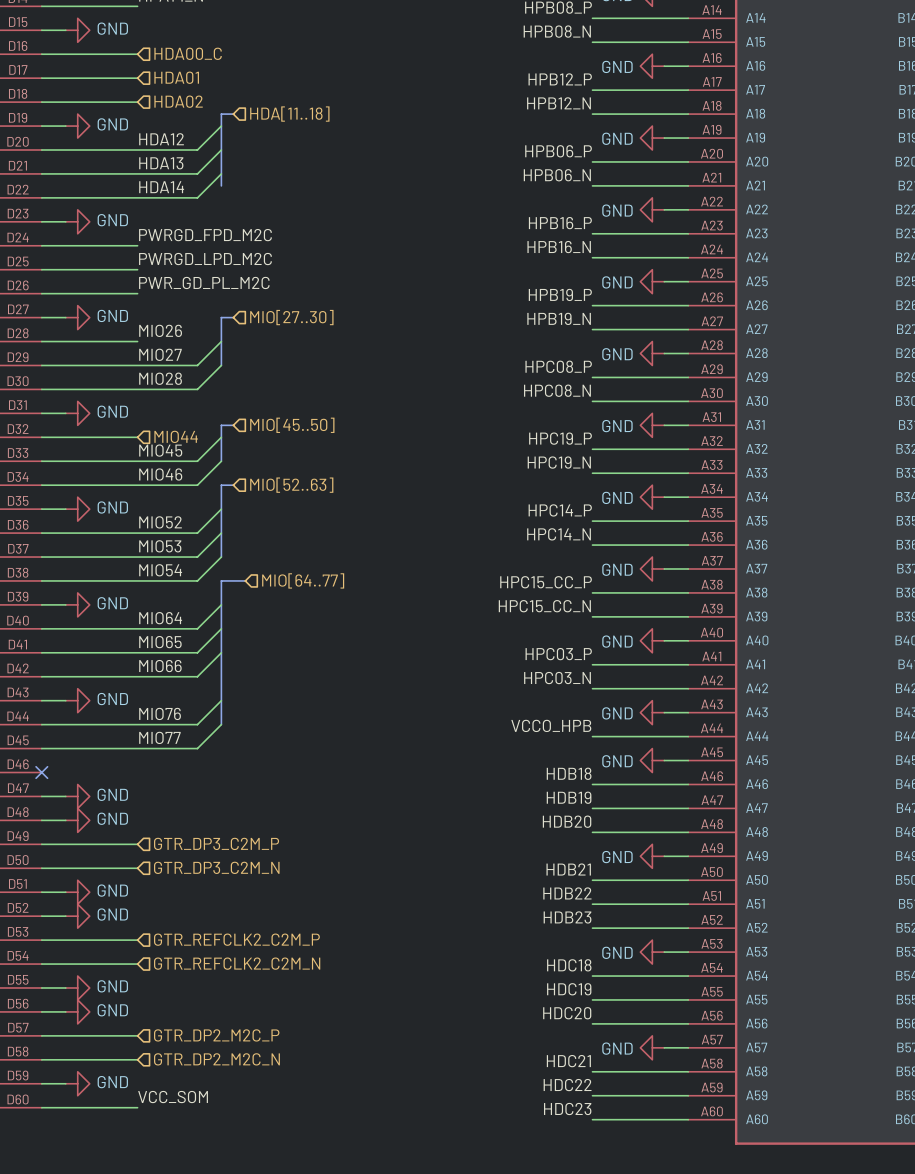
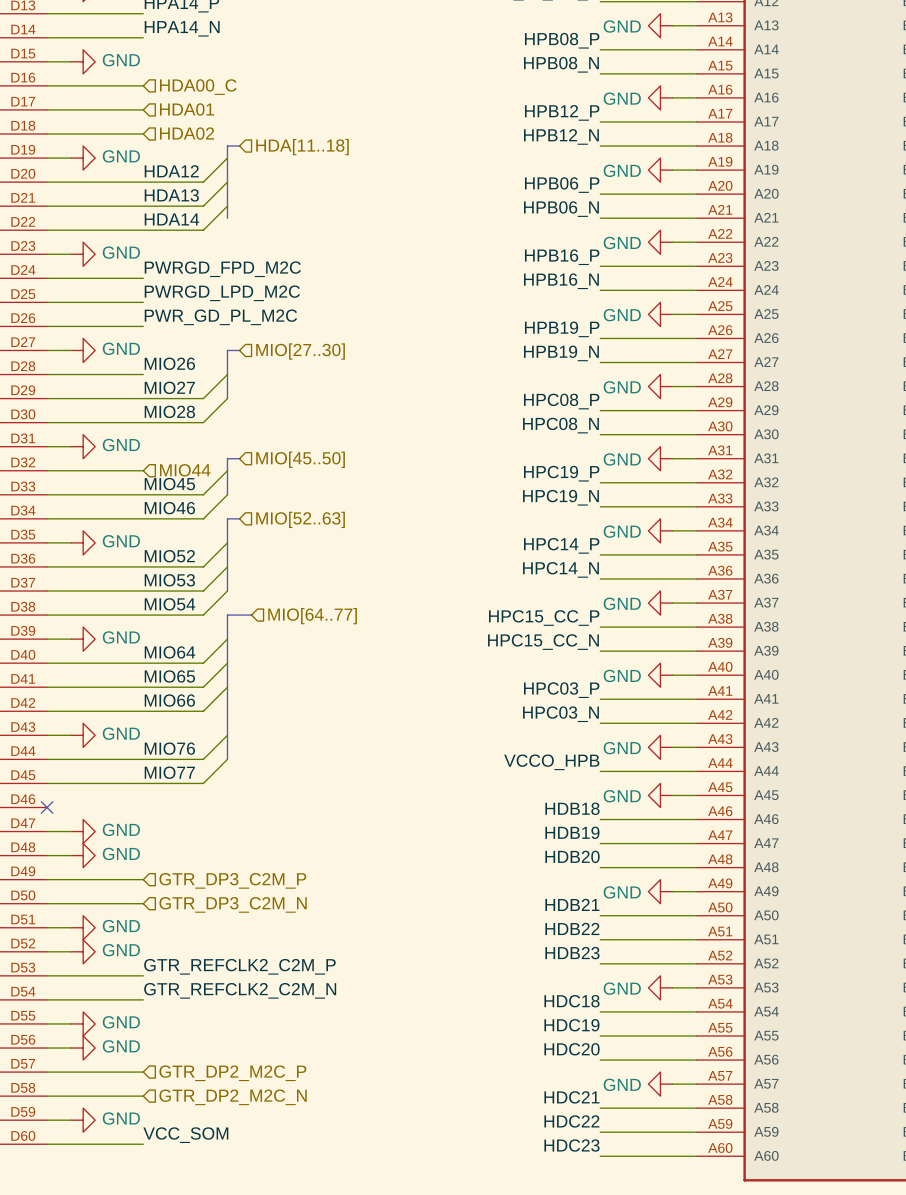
label: none -> GTR_REFCLK2_C2M_P (239, 966)
hierarchical label: GTR_REFCLK2_C2M_P (236, 939) -> none
label: none -> GTR_REFCLK2_C2M_N (240, 990)
hierarchical label: GTR_REFCLK2_C2M_N (237, 963) -> none

